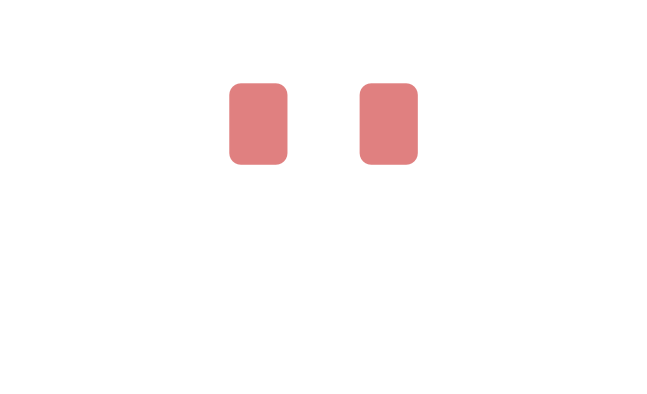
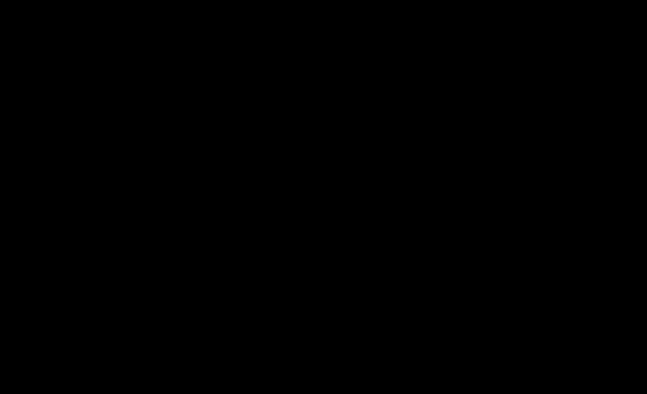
part: (323, 124) -> none

